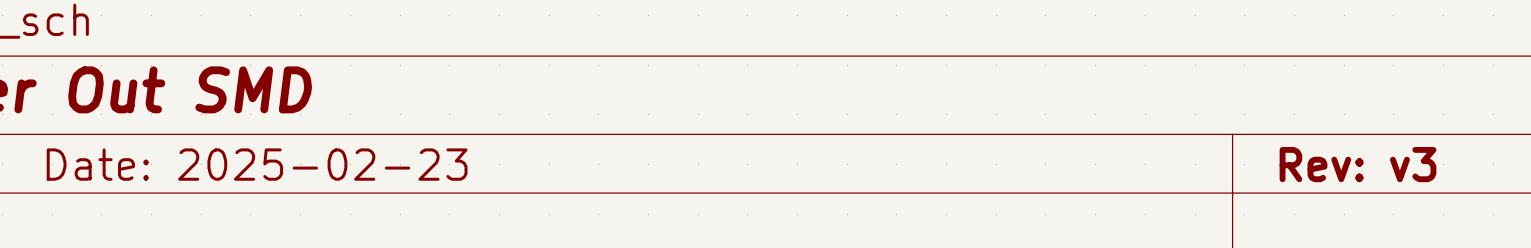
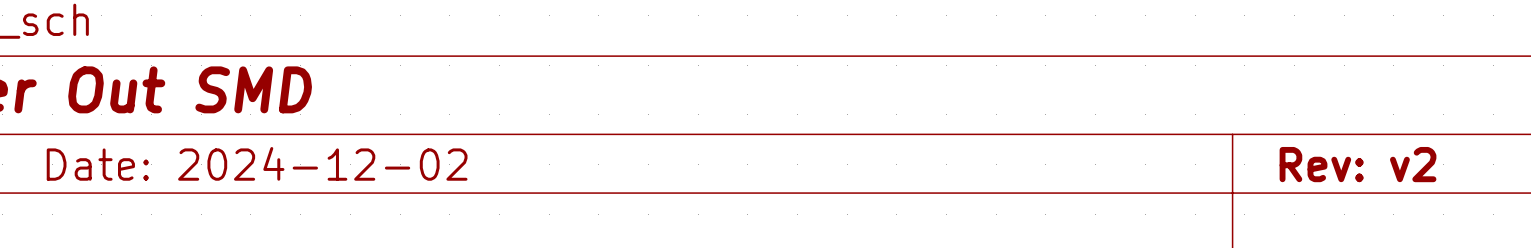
title block: Date: 2025-02-23 (257, 164) -> Date: 2024-12-02 (257, 163)
title block: Rev: v3 (1358, 164) -> Rev: v2 (1358, 164)

